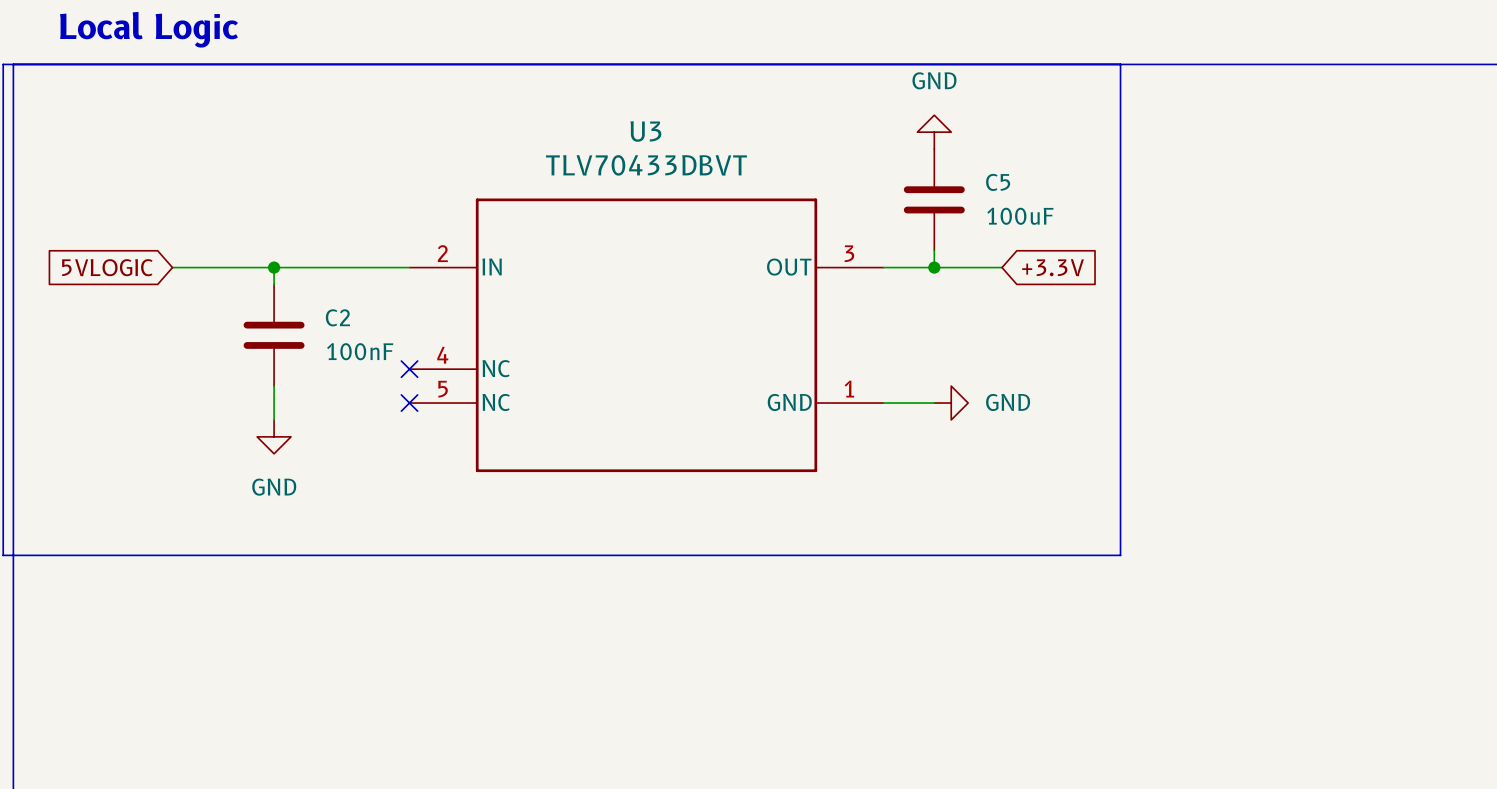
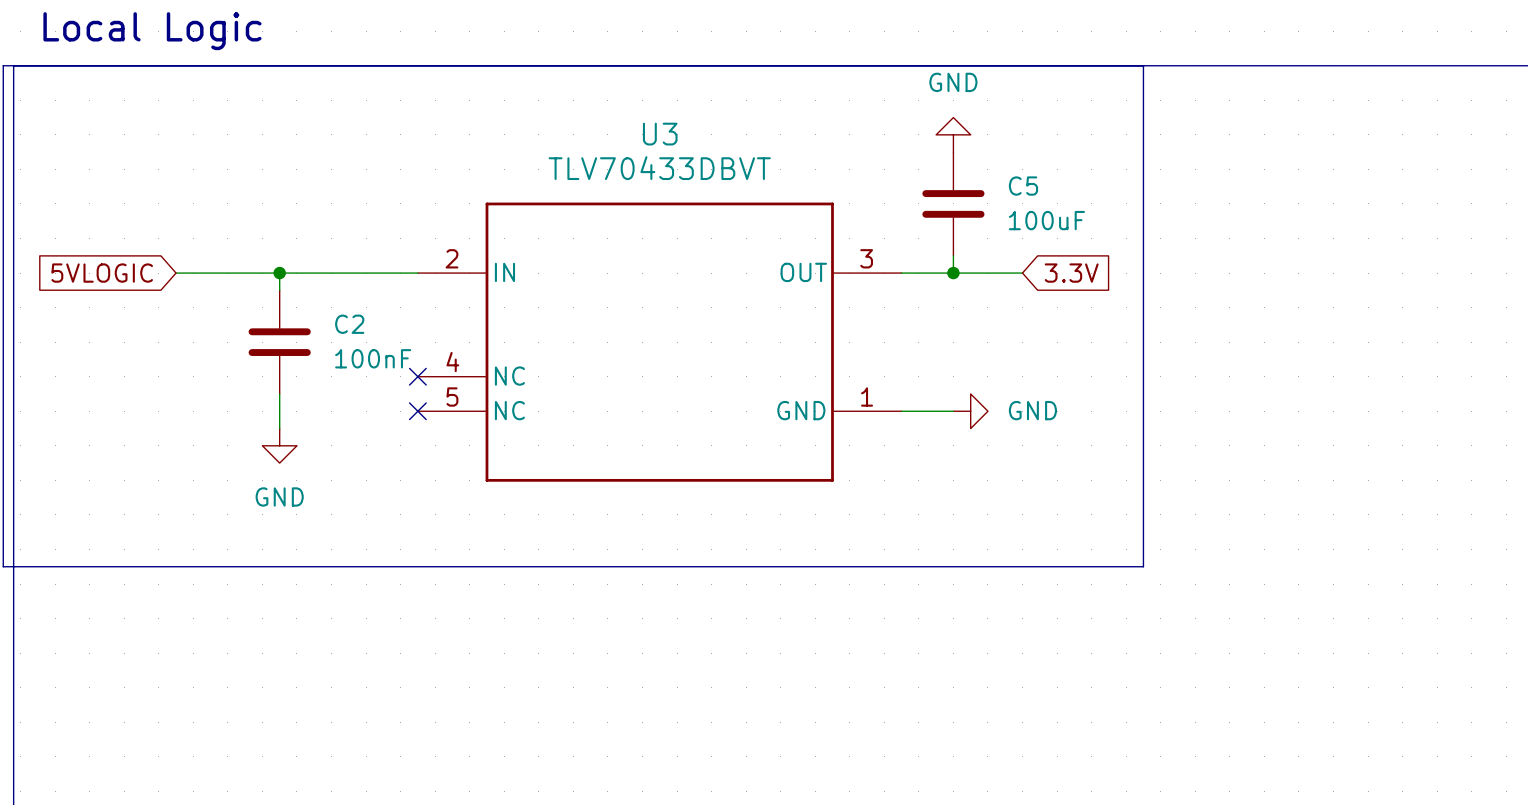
global label: +3.3V (1053, 267) -> 3.3V (1071, 273)

